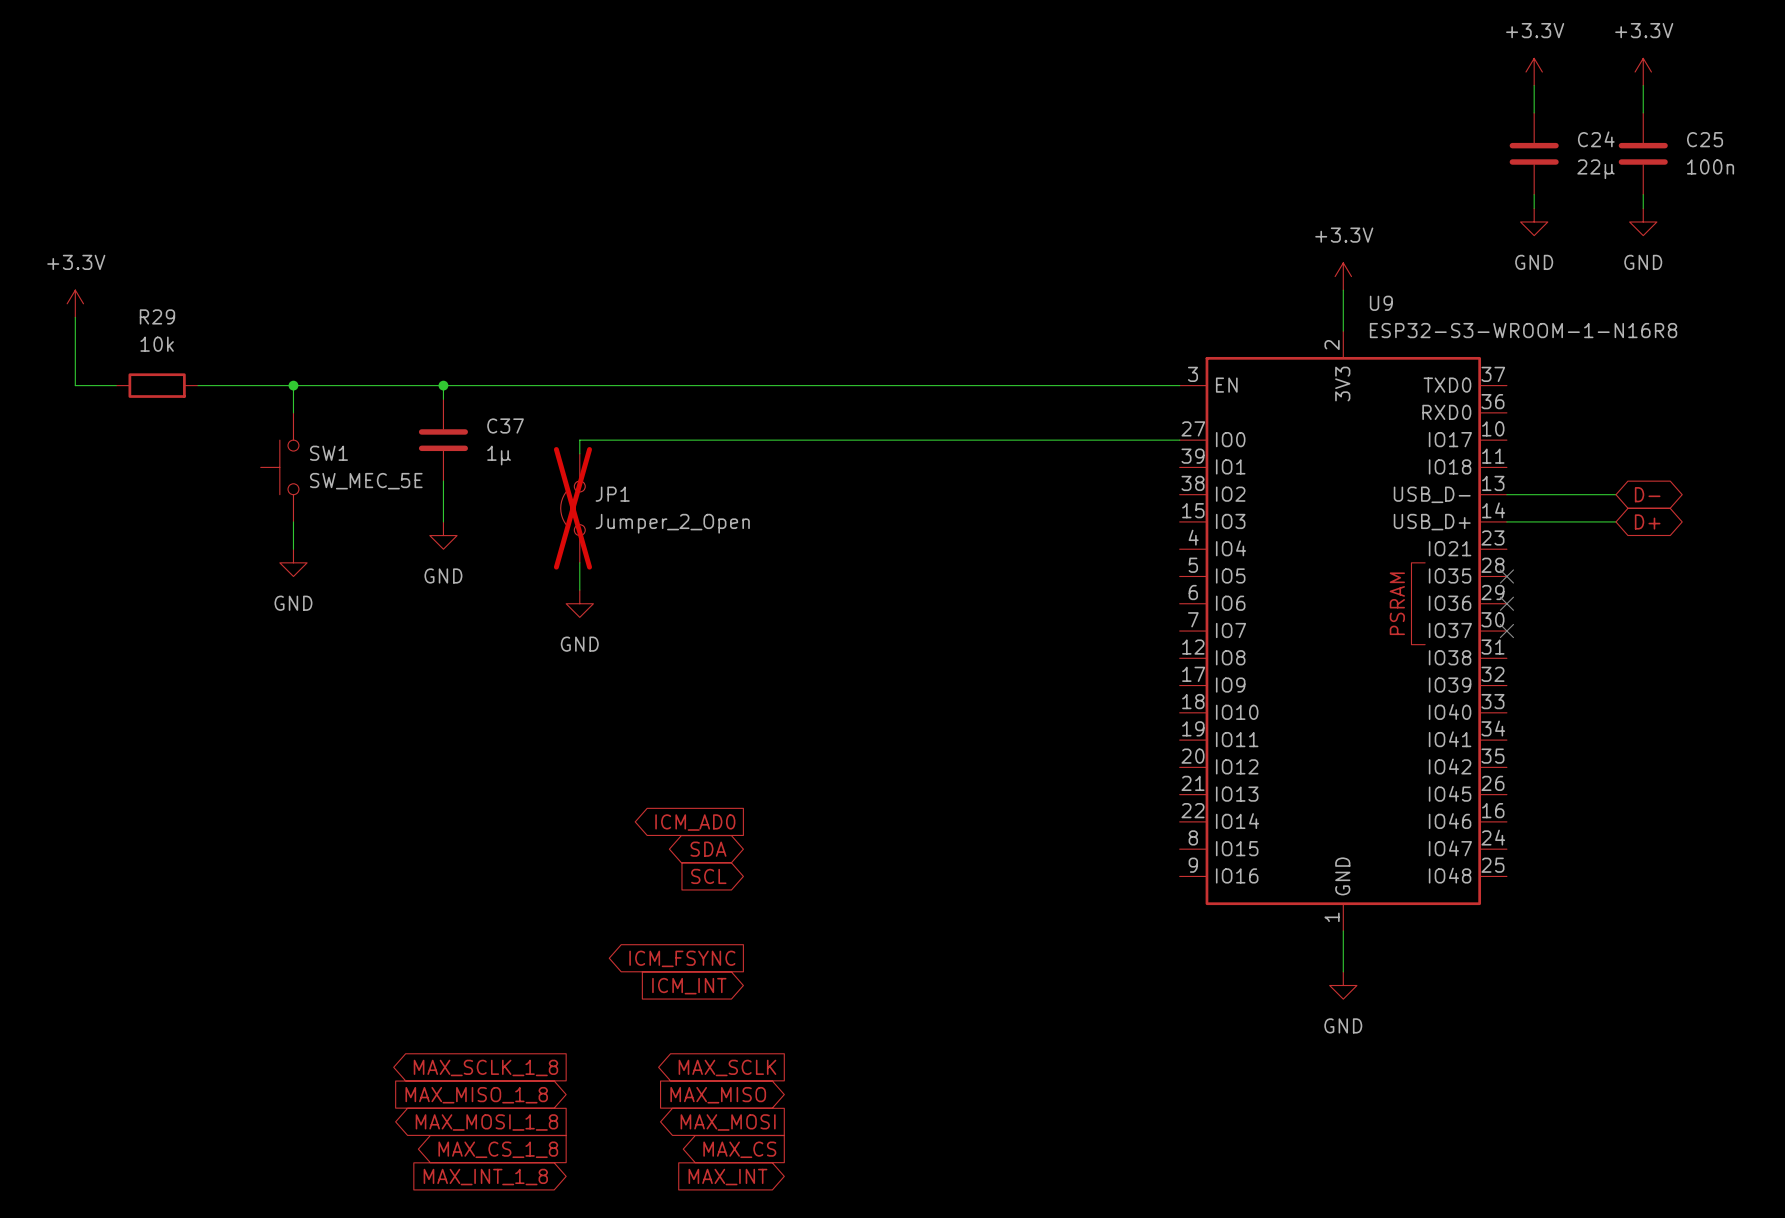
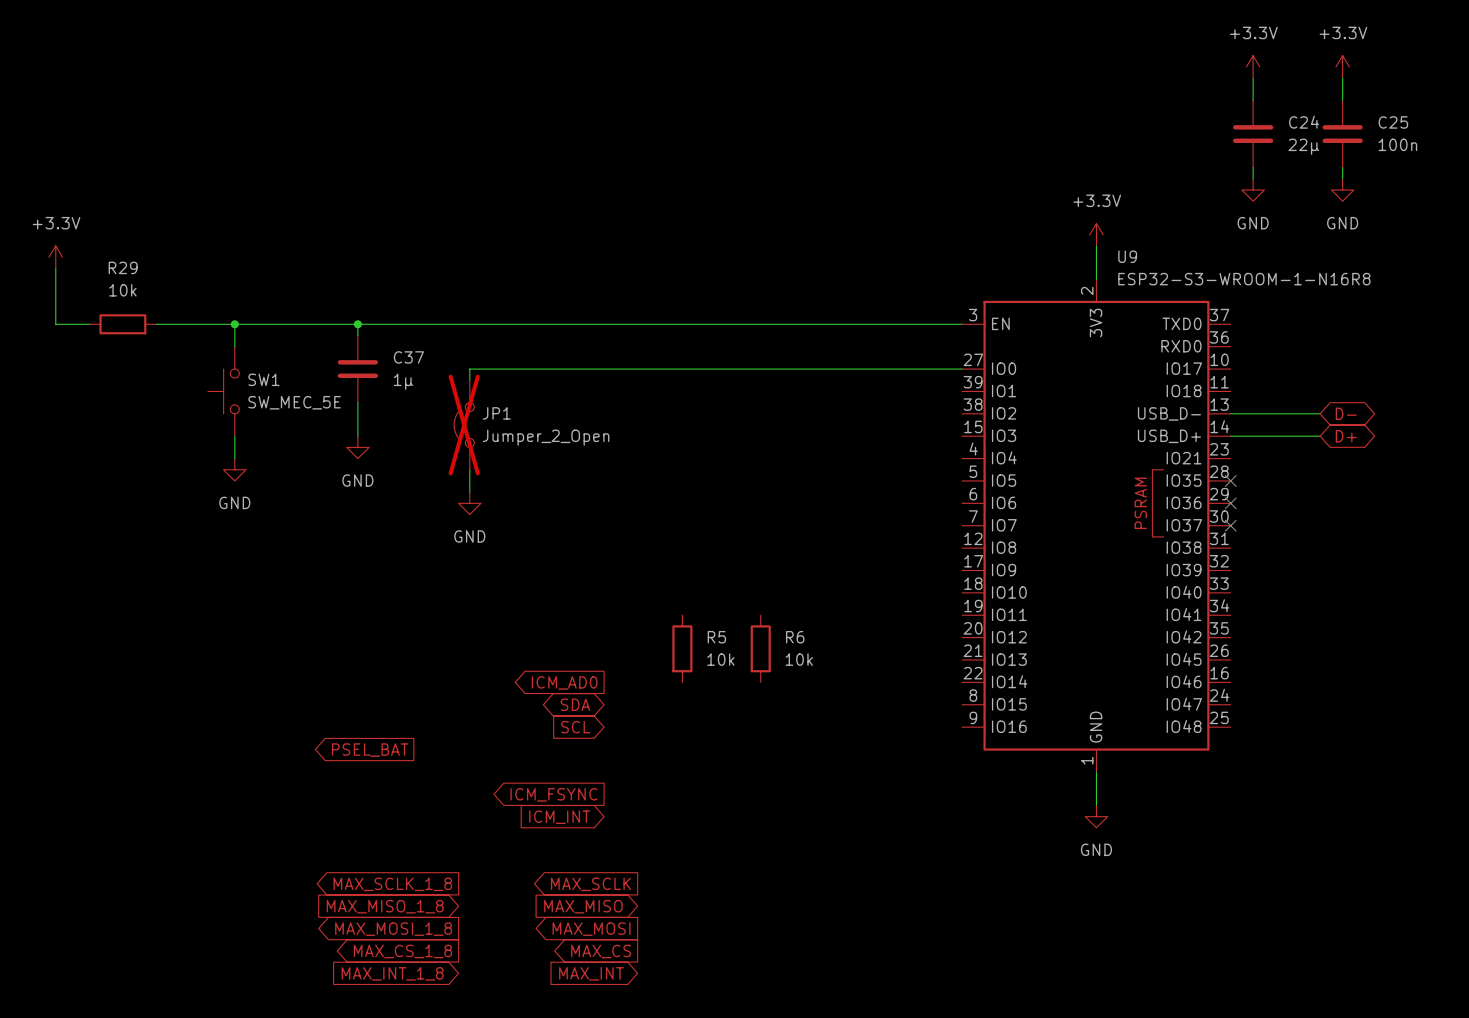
R5: none -> 10k (682, 648)
R6: none -> 10k (760, 648)
global label: none -> PSEL_BAT (370, 750)

